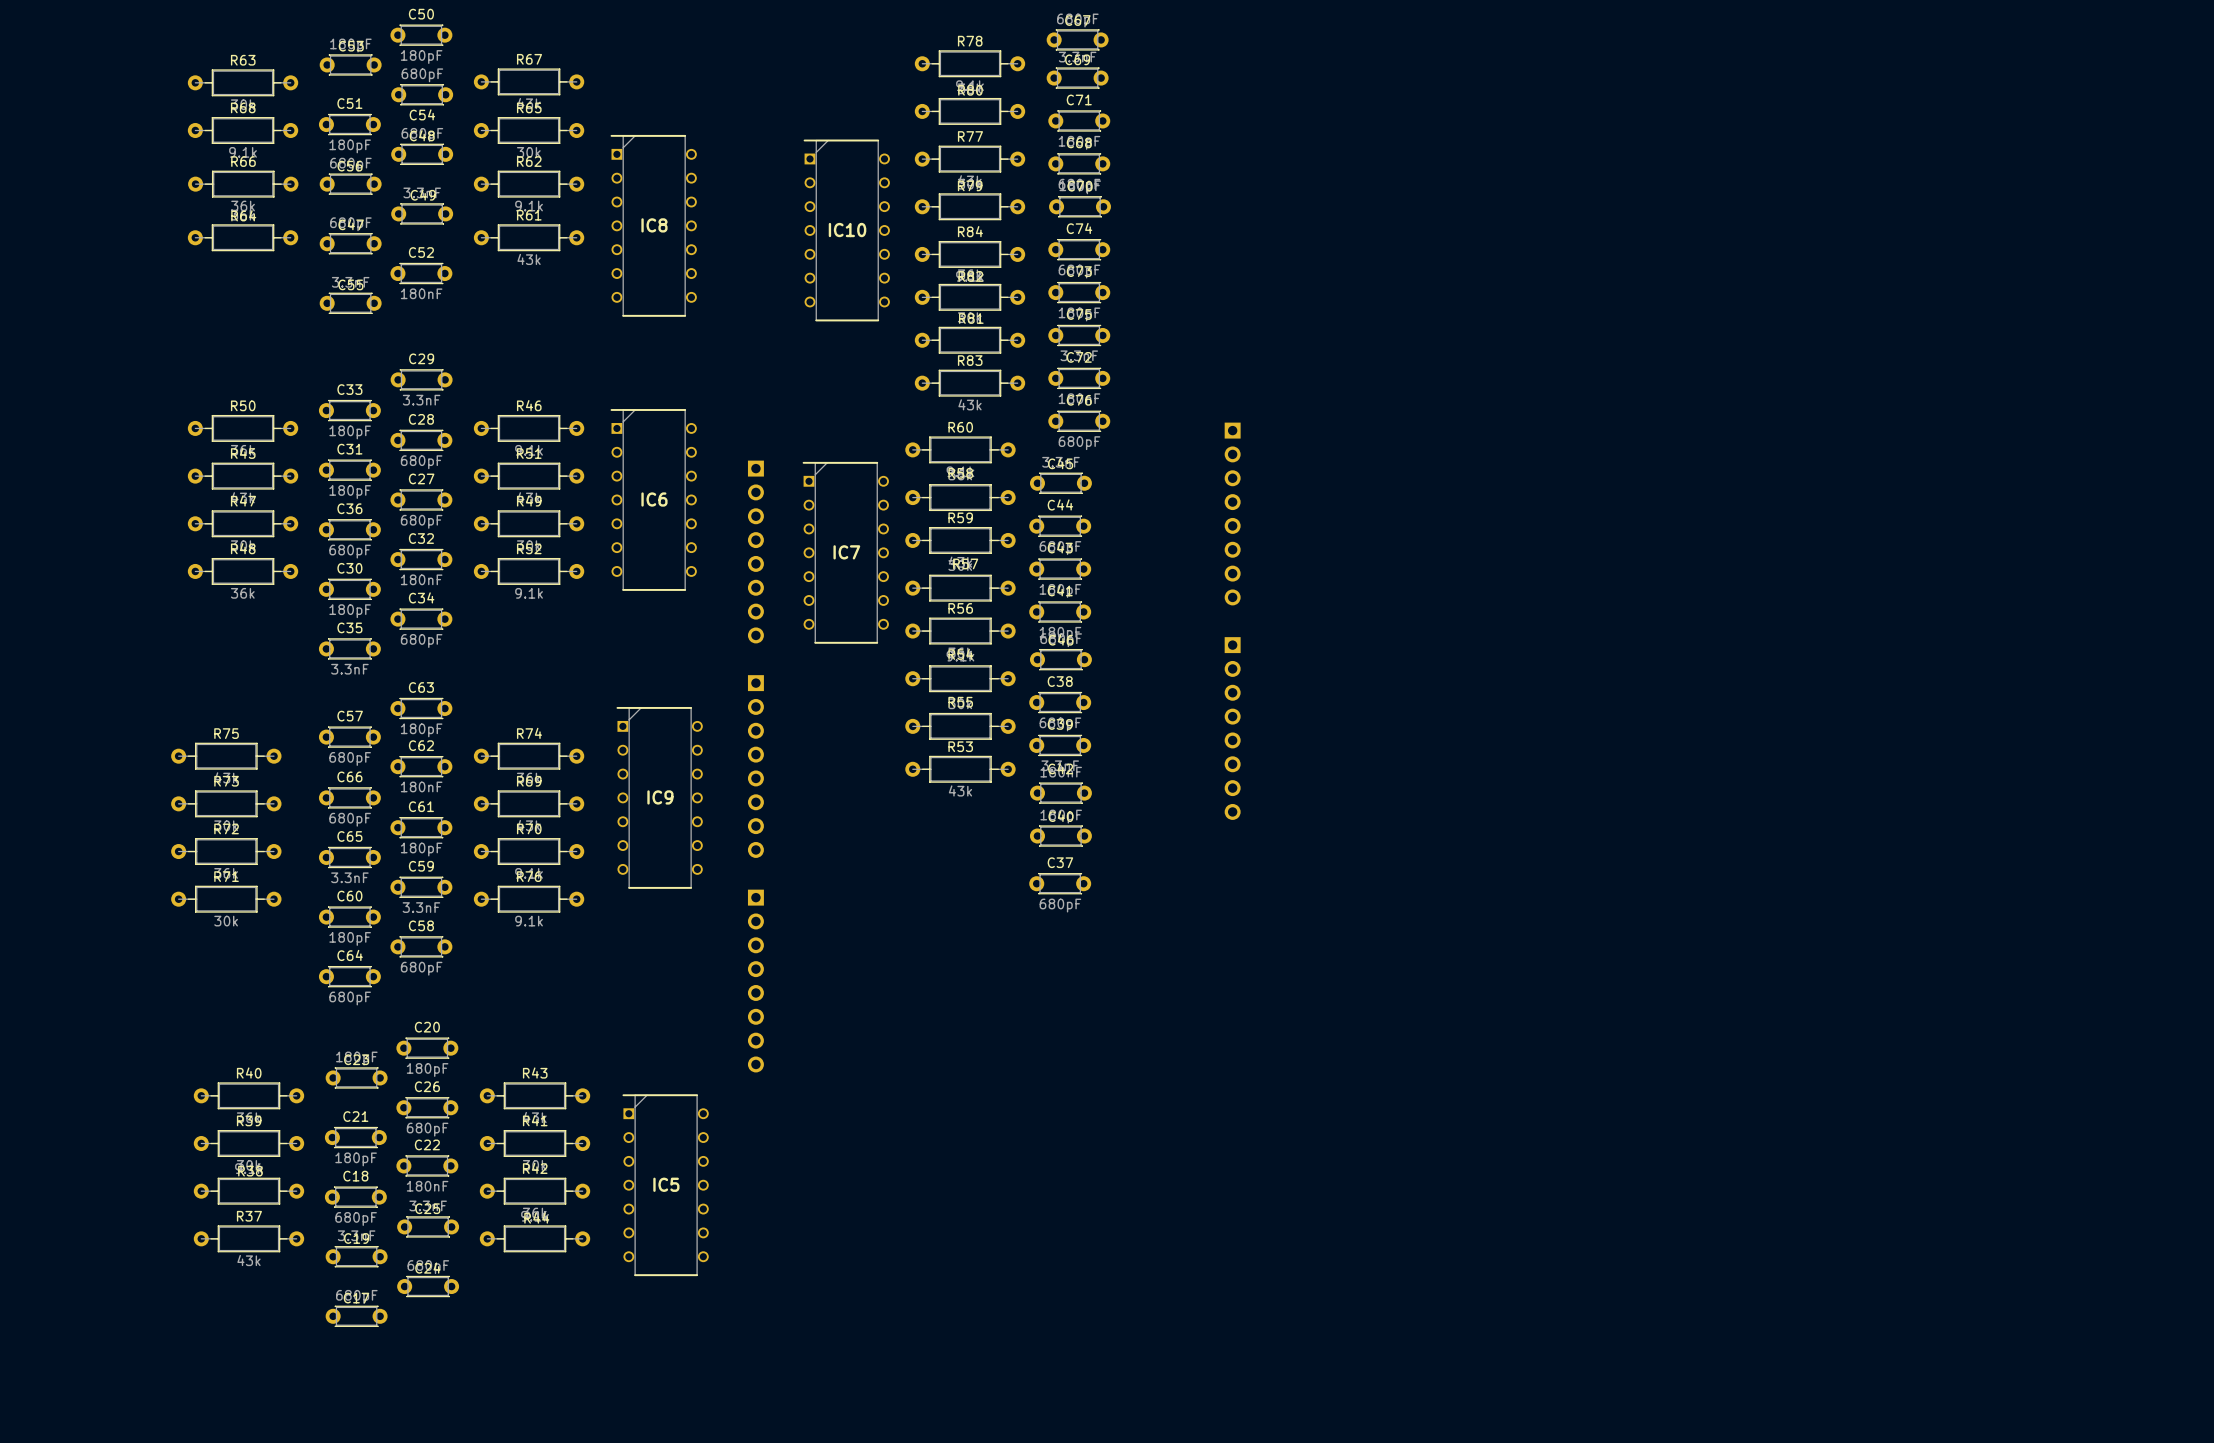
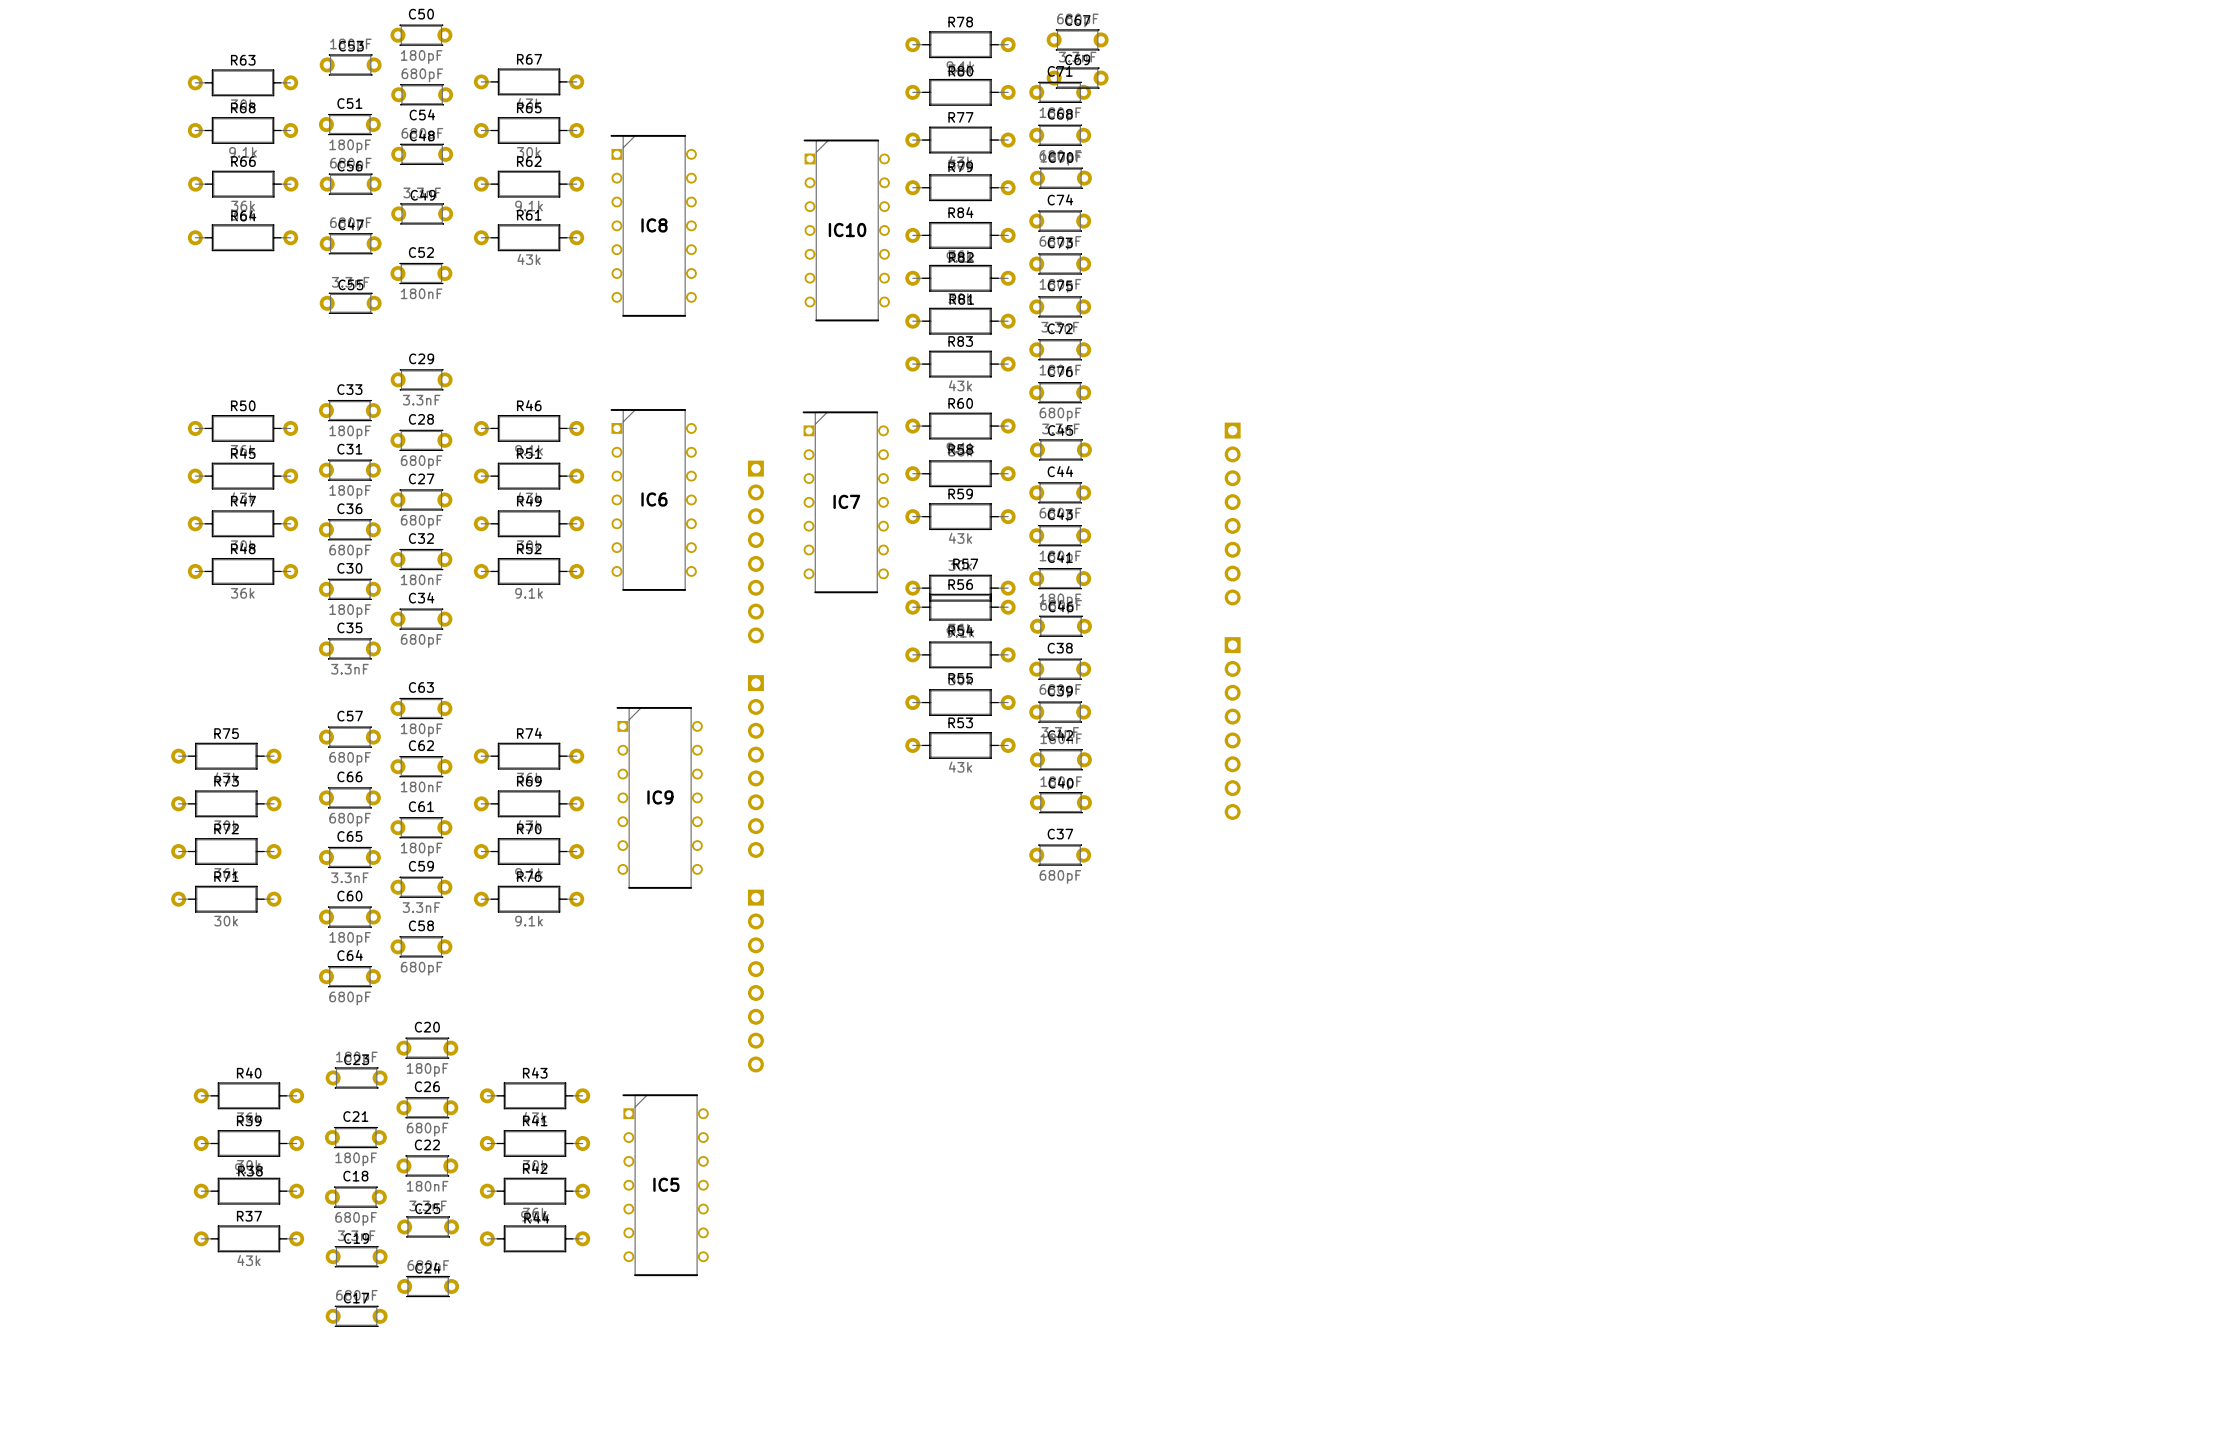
R78 position: (970, 63) -> (960, 44)
R80 position: (970, 111) -> (960, 92)
C71 position: (1079, 120) -> (1060, 92)
R77 position: (970, 159) -> (960, 140)
C68 position: (1079, 163) -> (1060, 135)
R79 position: (970, 206) -> (960, 187)
C70 position: (1080, 206) -> (1060, 178)
C74 position: (1079, 249) -> (1060, 221)
R84 position: (970, 254) -> (960, 235)
C73 position: (1079, 292) -> (1060, 263)
R82 position: (970, 297) -> (960, 278)
C75 position: (1079, 335) -> (1060, 306)
R81 position: (970, 340) -> (960, 321)
C72 position: (1079, 378) -> (1060, 349)
R83 position: (970, 383) -> (960, 364)
C76 position: (1079, 421) -> (1060, 392)
R60 position: (960, 449) -> (960, 426)
C45 position: (1060, 483) -> (1060, 449)
R58 position: (960, 497) -> (960, 473)
C44 position: (1060, 526) -> (1060, 492)
R59 position: (960, 540) -> (960, 516)
IC7 position: (845, 552) -> (845, 502)
C43 position: (1060, 569) -> (1060, 535)
C41 position: (1060, 611) -> (1060, 578)
R56 position: (960, 631) -> (960, 607)
C46 position: (1060, 659) -> (1060, 626)
R54 position: (960, 678) -> (960, 654)
C38 position: (1060, 702) -> (1060, 669)
R55 position: (960, 726) -> (960, 702)
C39 position: (1060, 745) -> (1060, 712)
R53 position: (960, 769) -> (960, 745)
C42 position: (1060, 793) -> (1060, 759)
C40 position: (1060, 836) -> (1060, 802)
C37 position: (1060, 883) -> (1060, 855)

